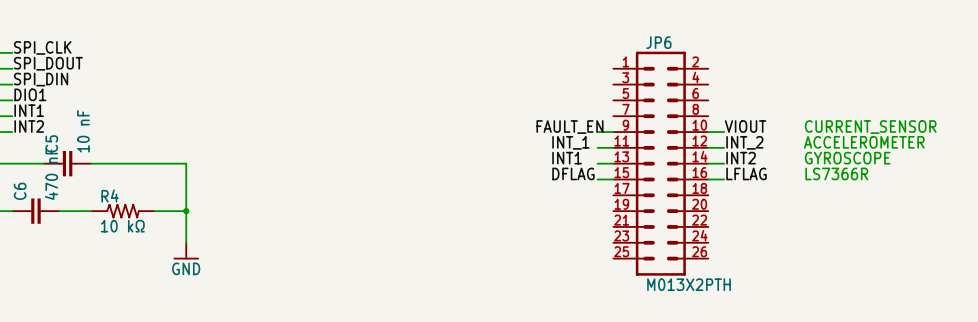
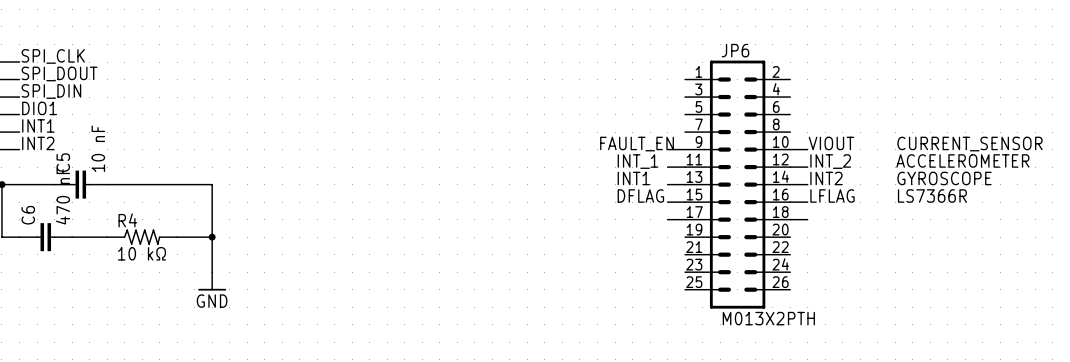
wire: none -> (667, 219) (685, 219)
wire: none -> (790, 219) (807, 219)

